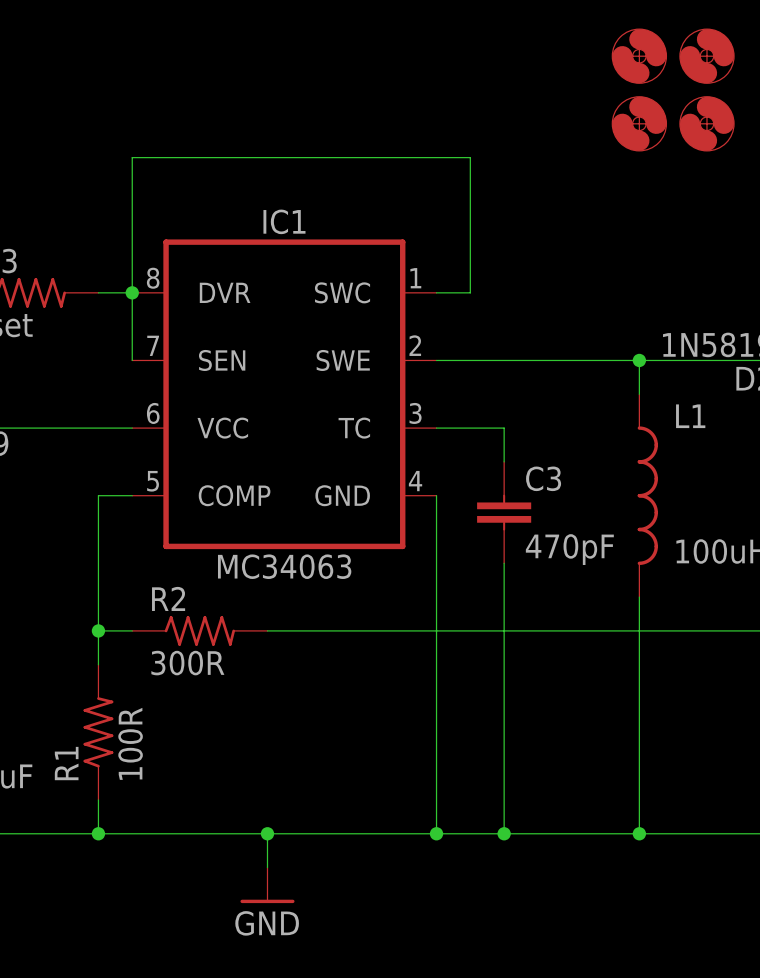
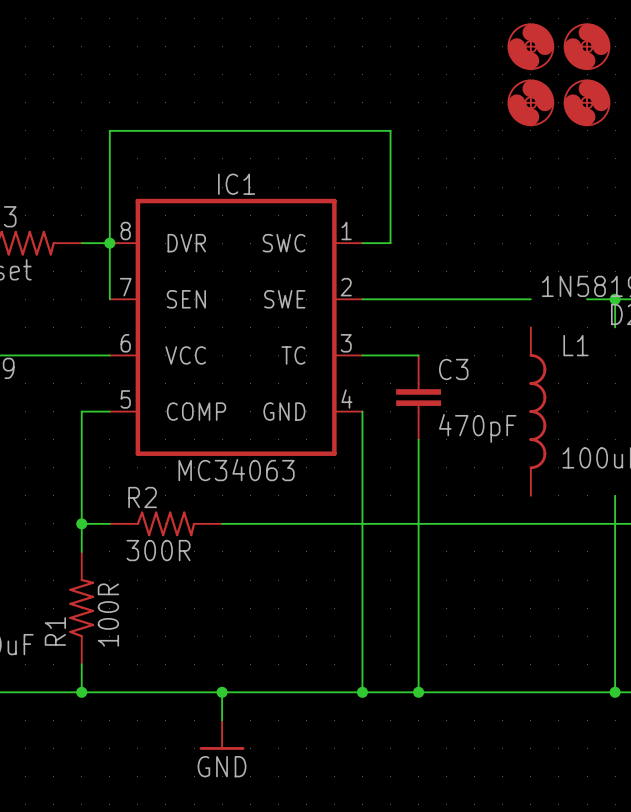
junction: (639, 360) -> none
wire: (706, 360) (639, 360) (639, 394) -> none
wire: none -> (615, 299) (615, 327)
junction: none -> (615, 299)
C3 position: (504, 512) -> (418, 397)
wire: (639, 597) (639, 833) -> (615, 495) (615, 692)
junction: (639, 833) -> none
junction: none -> (615, 692)

